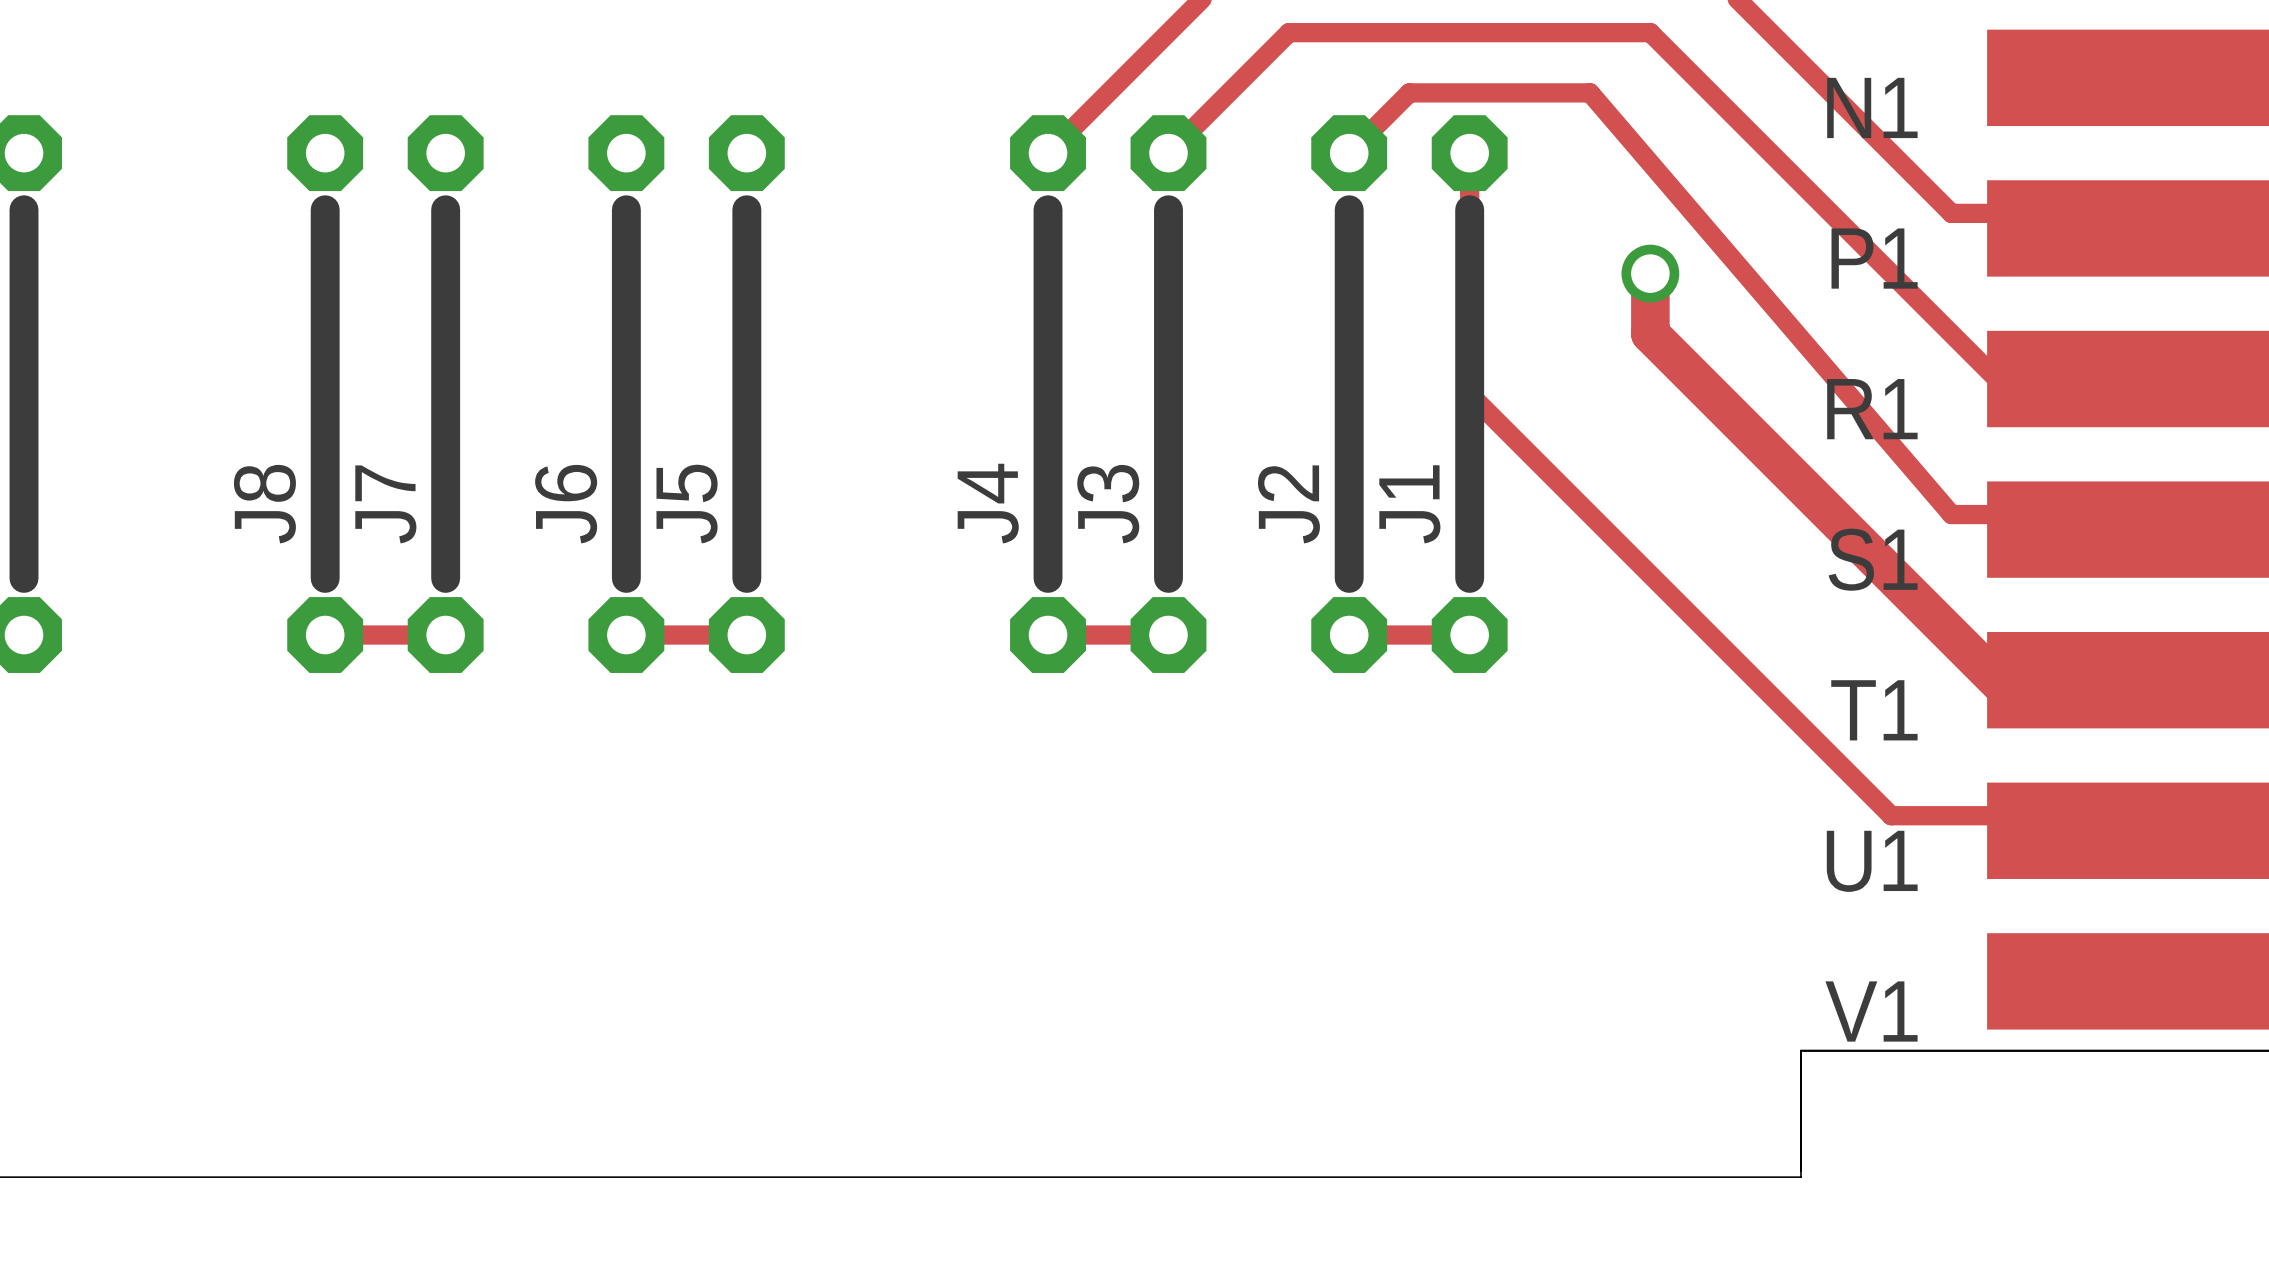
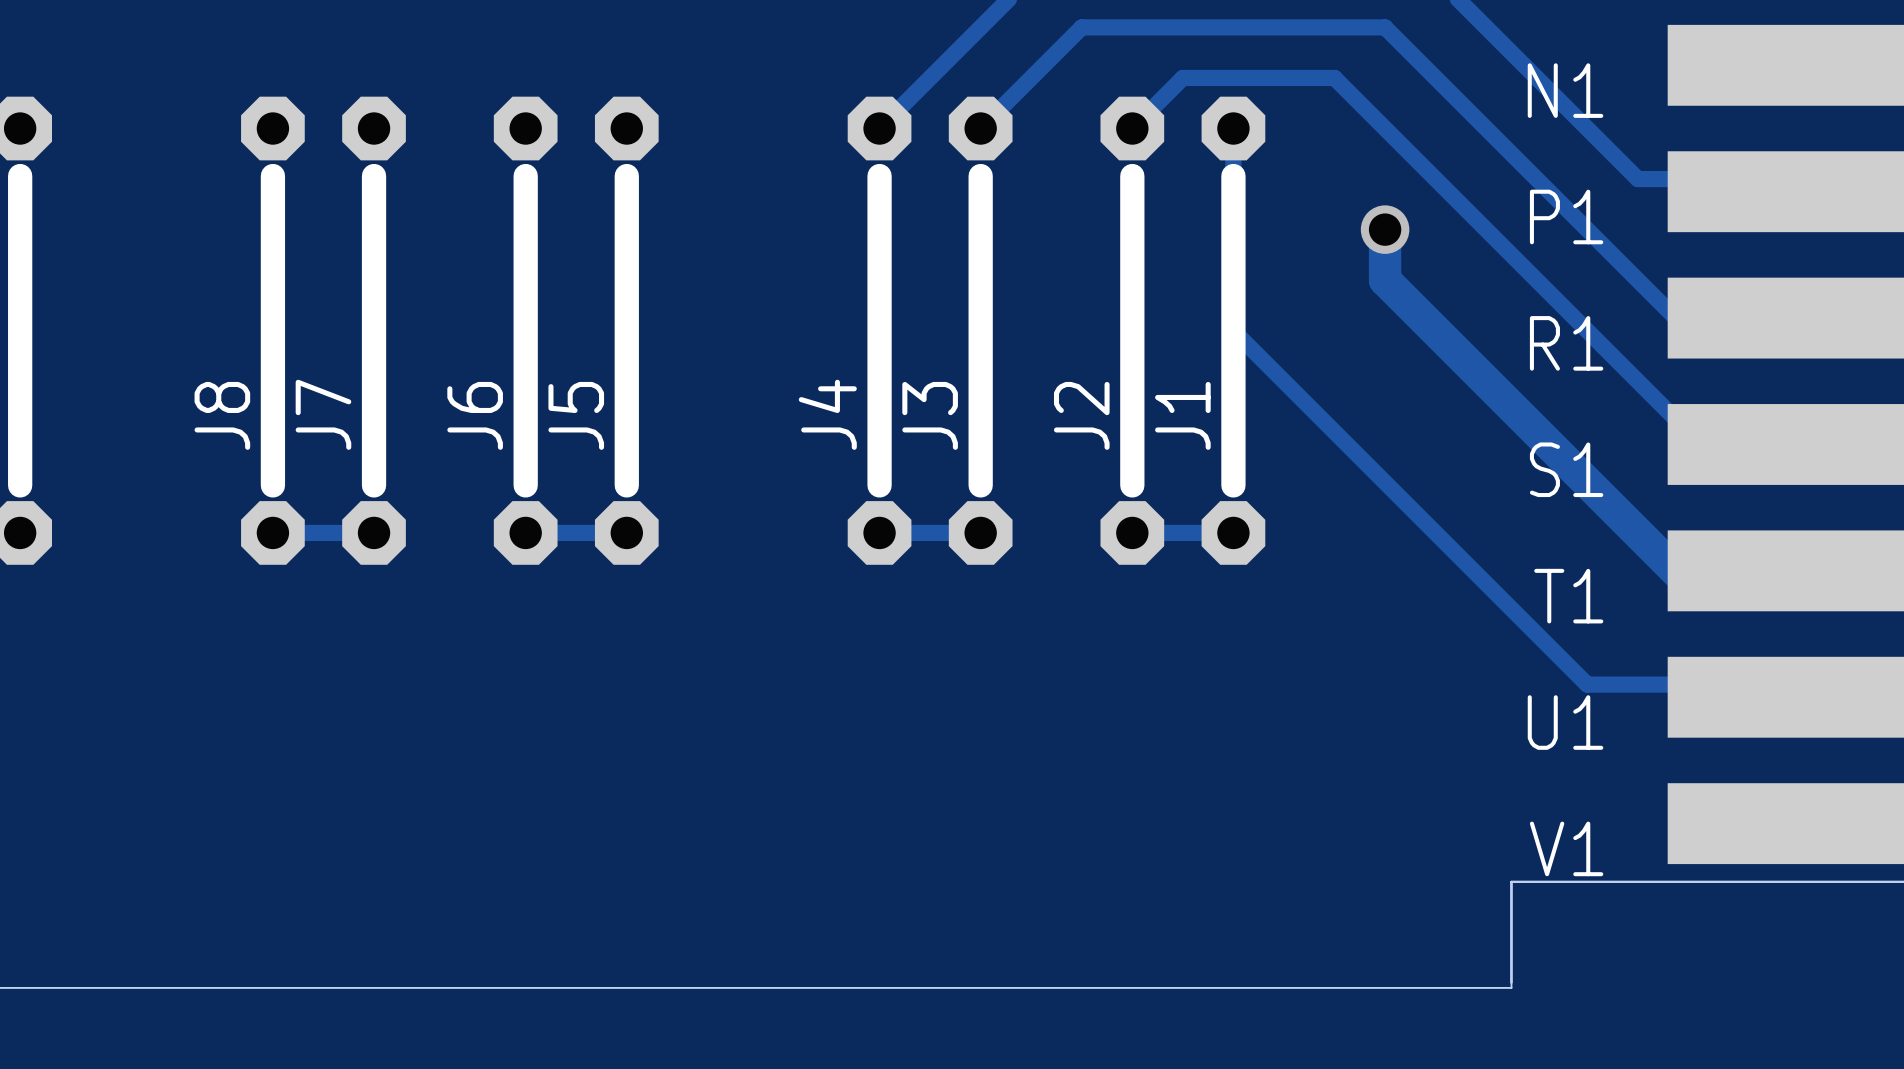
track: (1590, 92) (1951, 514) (2011, 514) -> (1334, 77) (1688, 431)

